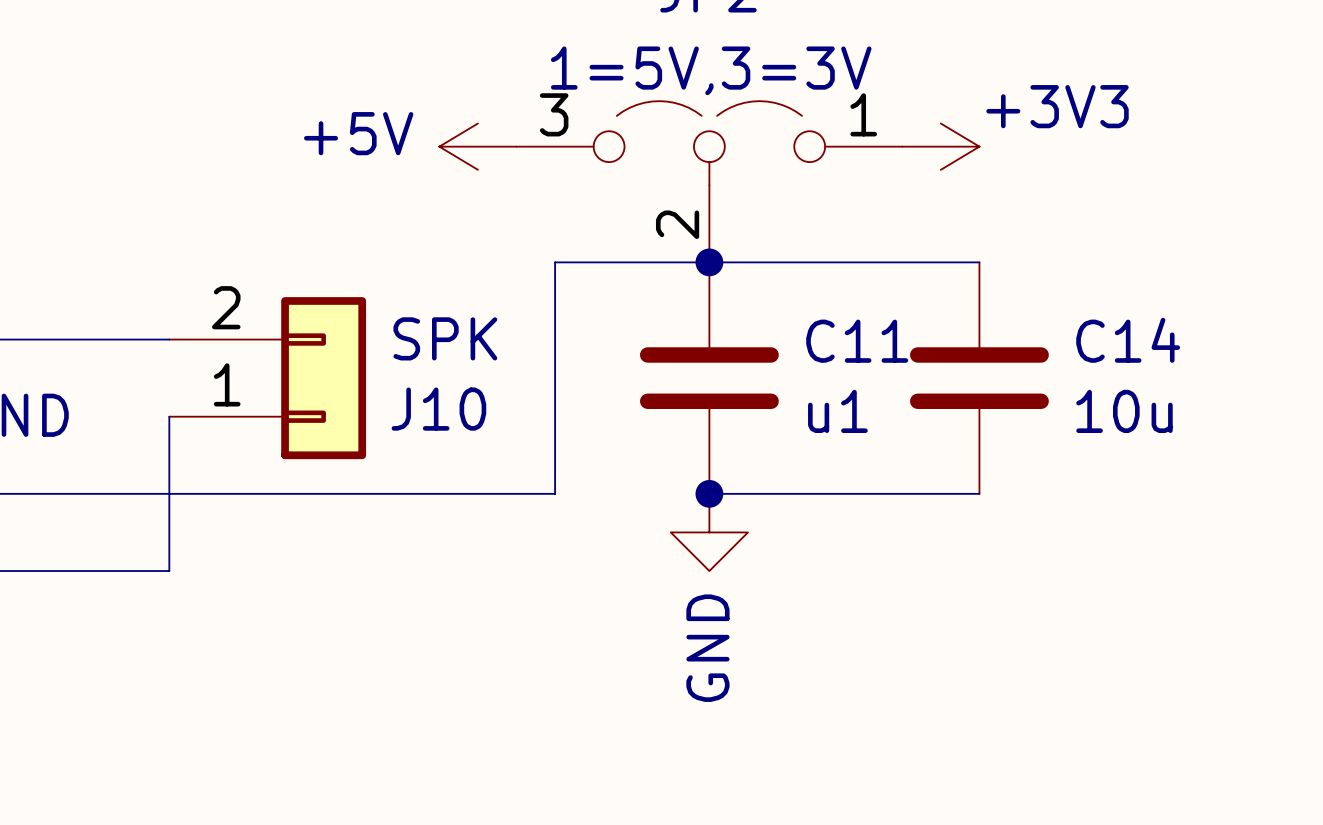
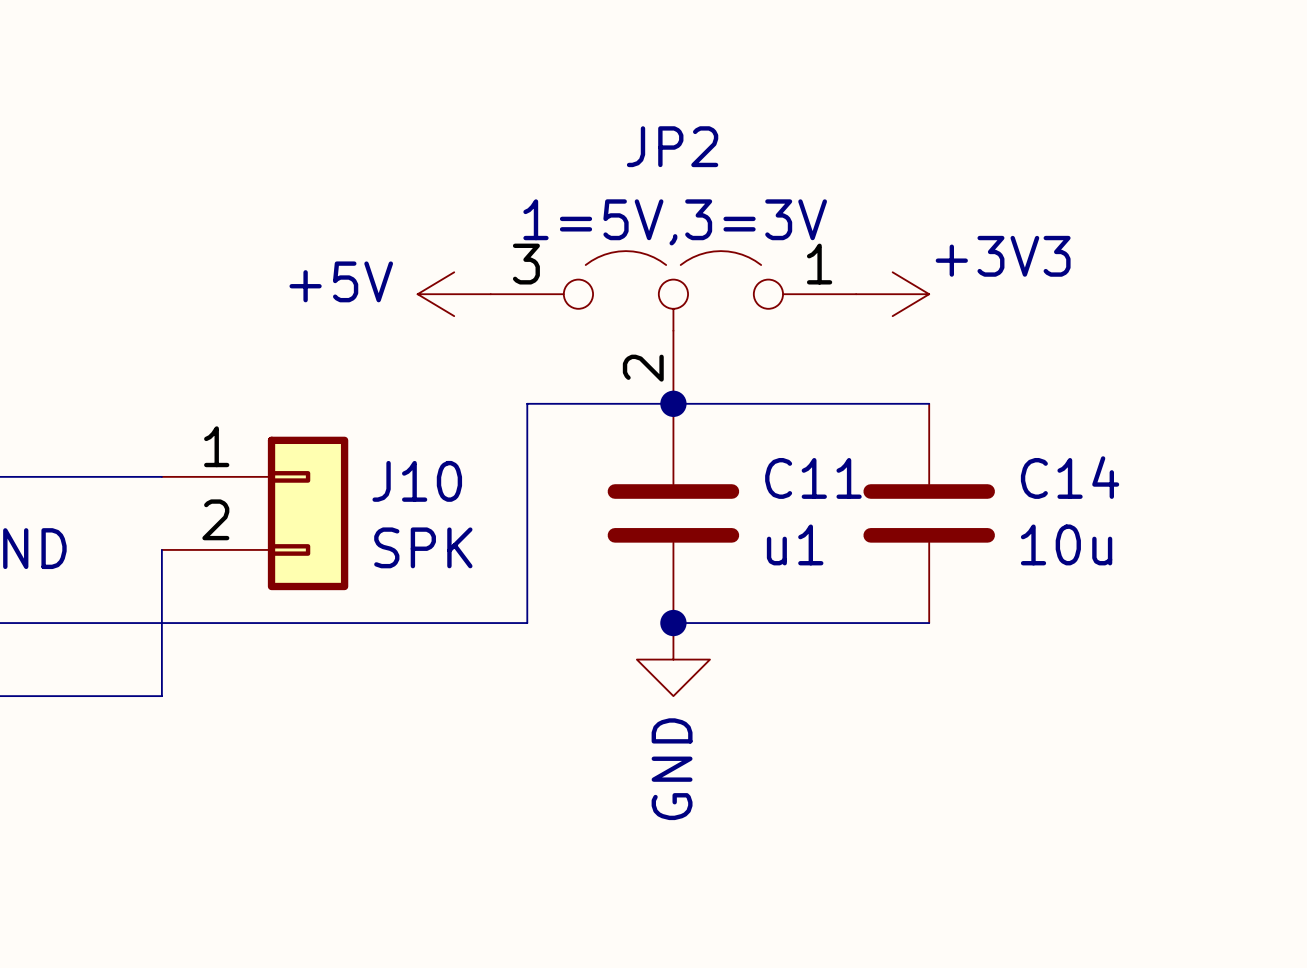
J10 flip: as is (323, 378) -> up-down (308, 513)

